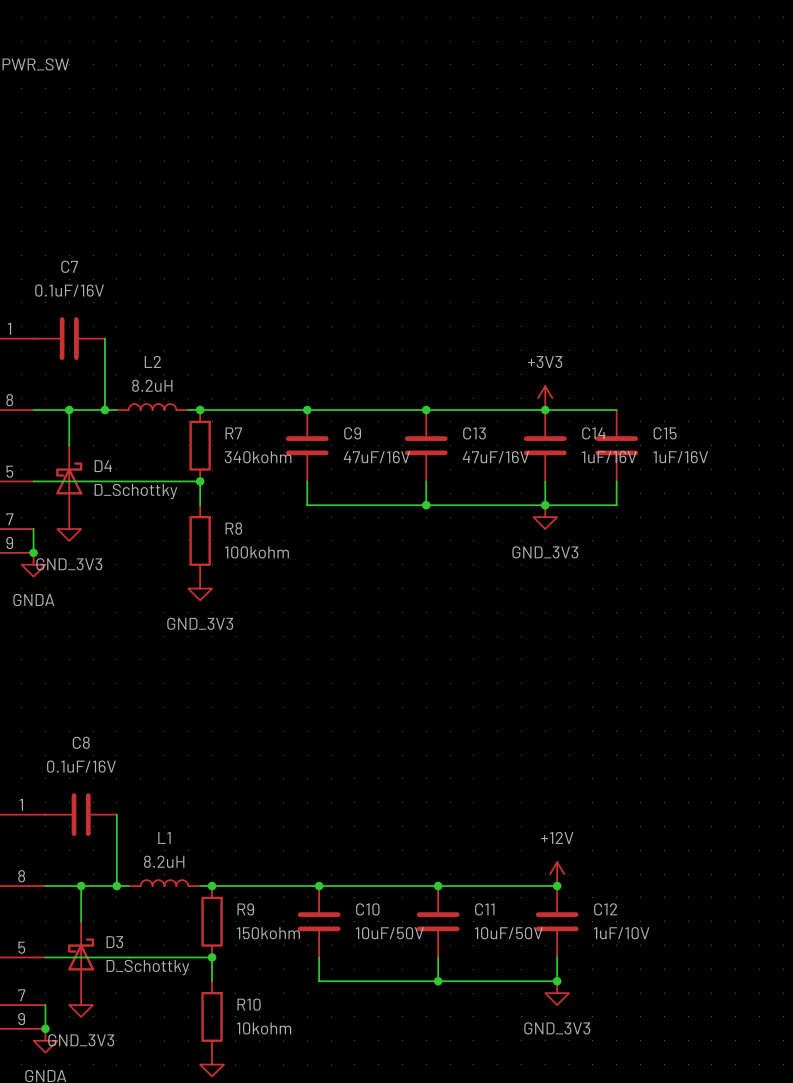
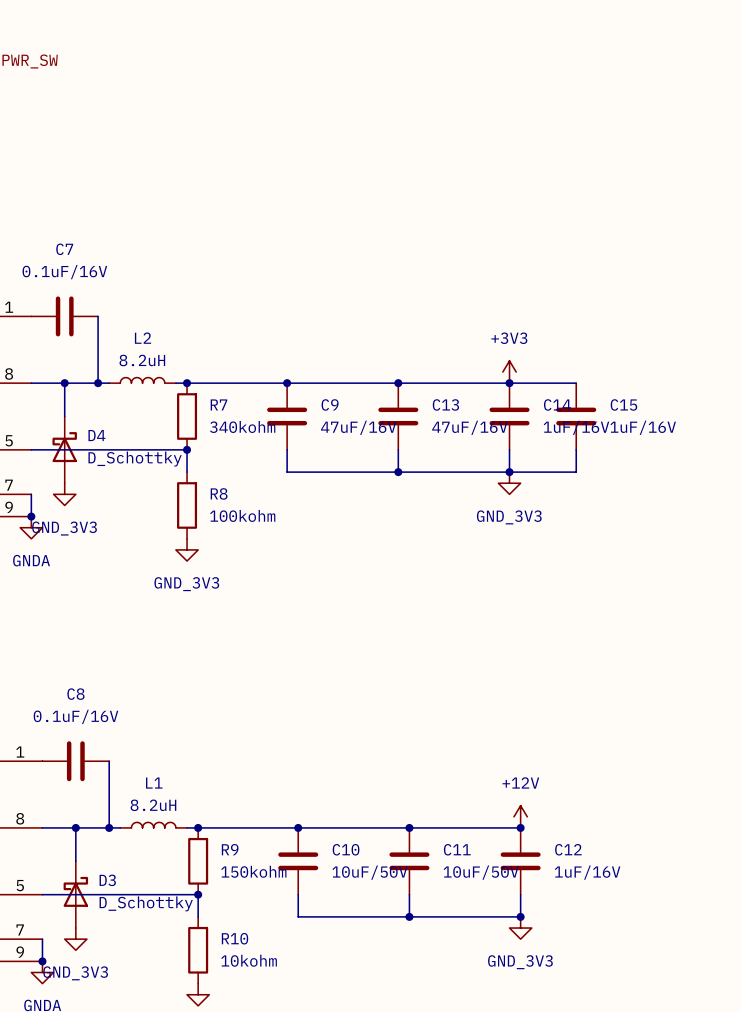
C12 value: 1uF/10V (621, 933) -> 1uF/16V (587, 872)

